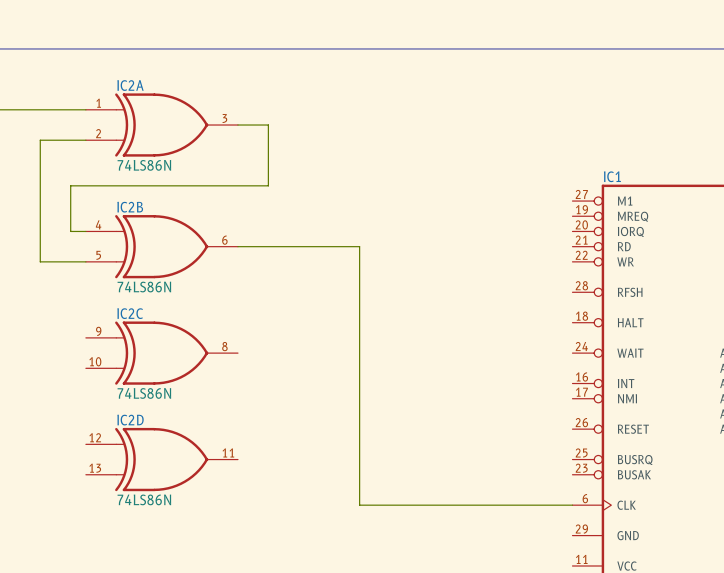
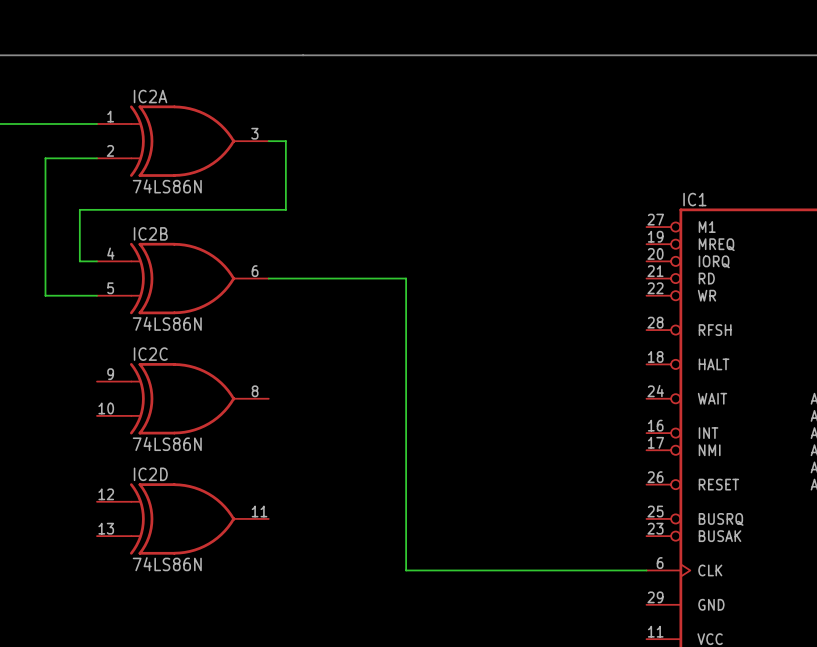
wire: (253, 125) (268, 125) (268, 185) (253, 185) -> (285, 141) (285, 209)

